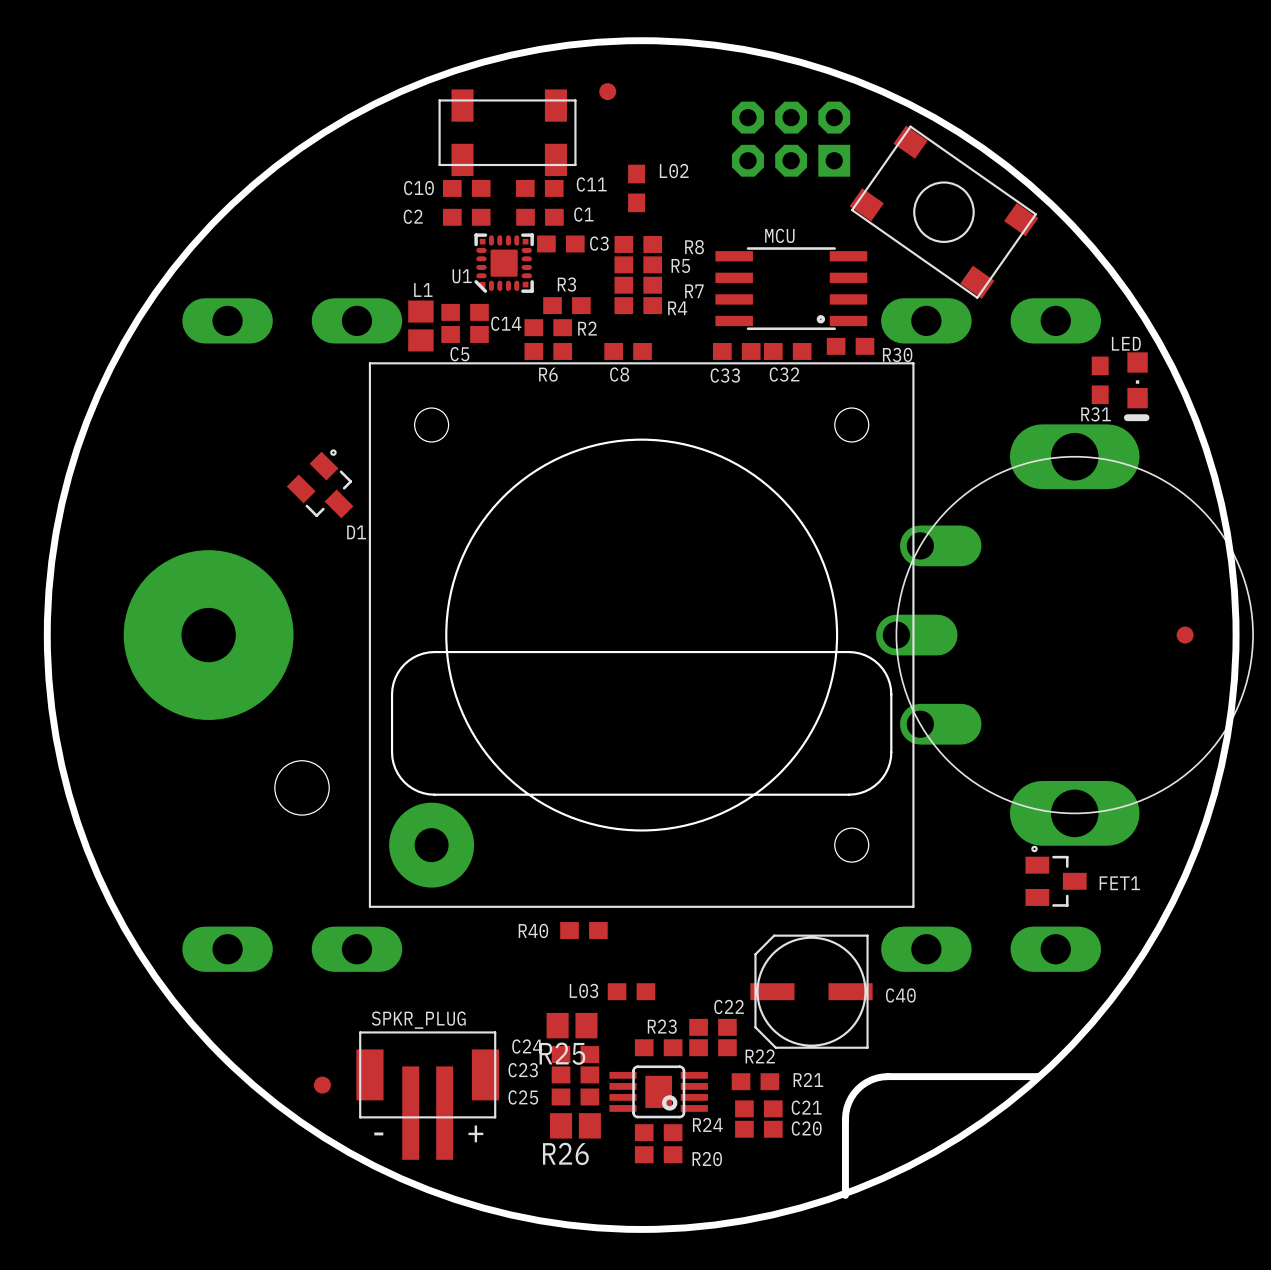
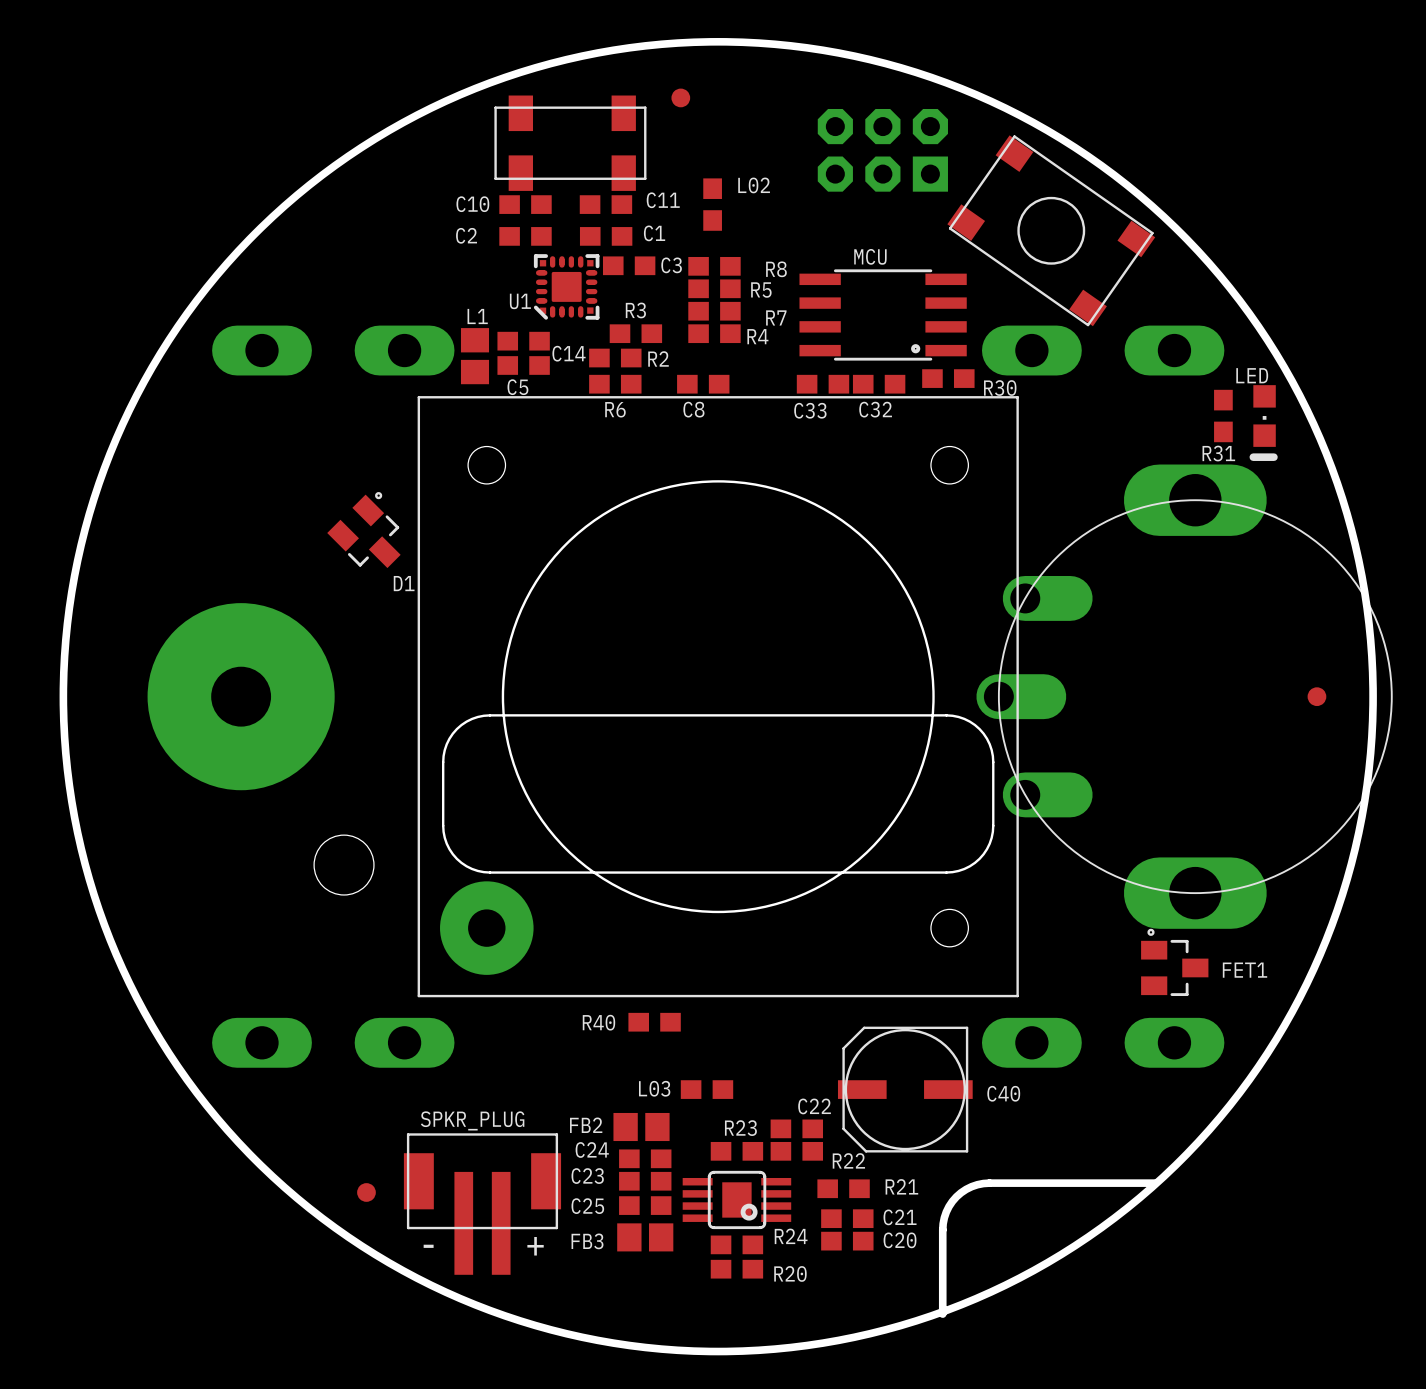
R25 name: R25 (562, 1053) -> FB2 (586, 1125)
R26 name: R26 (565, 1153) -> FB3 (587, 1241)

